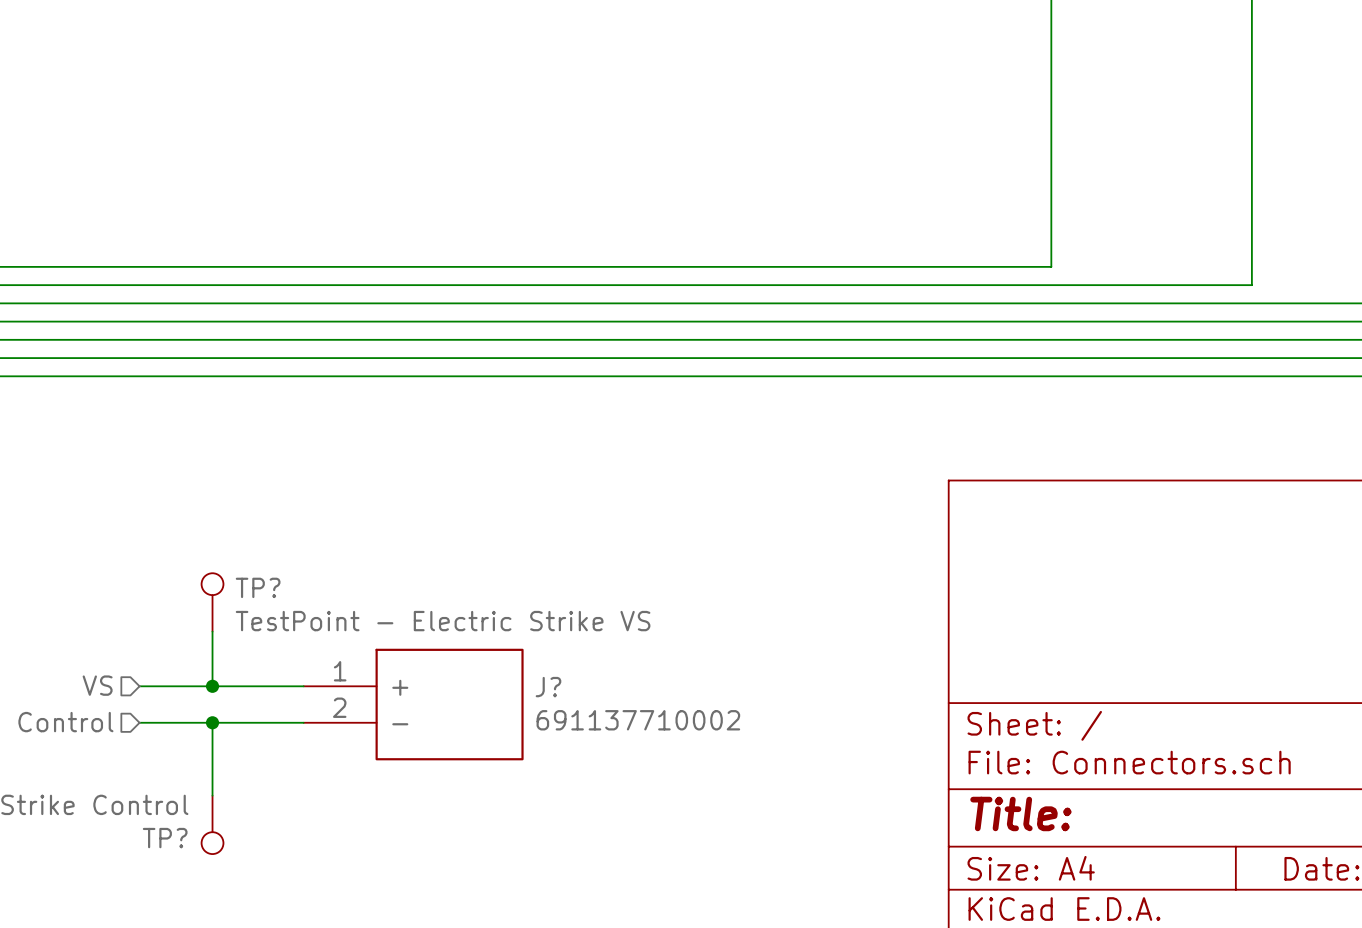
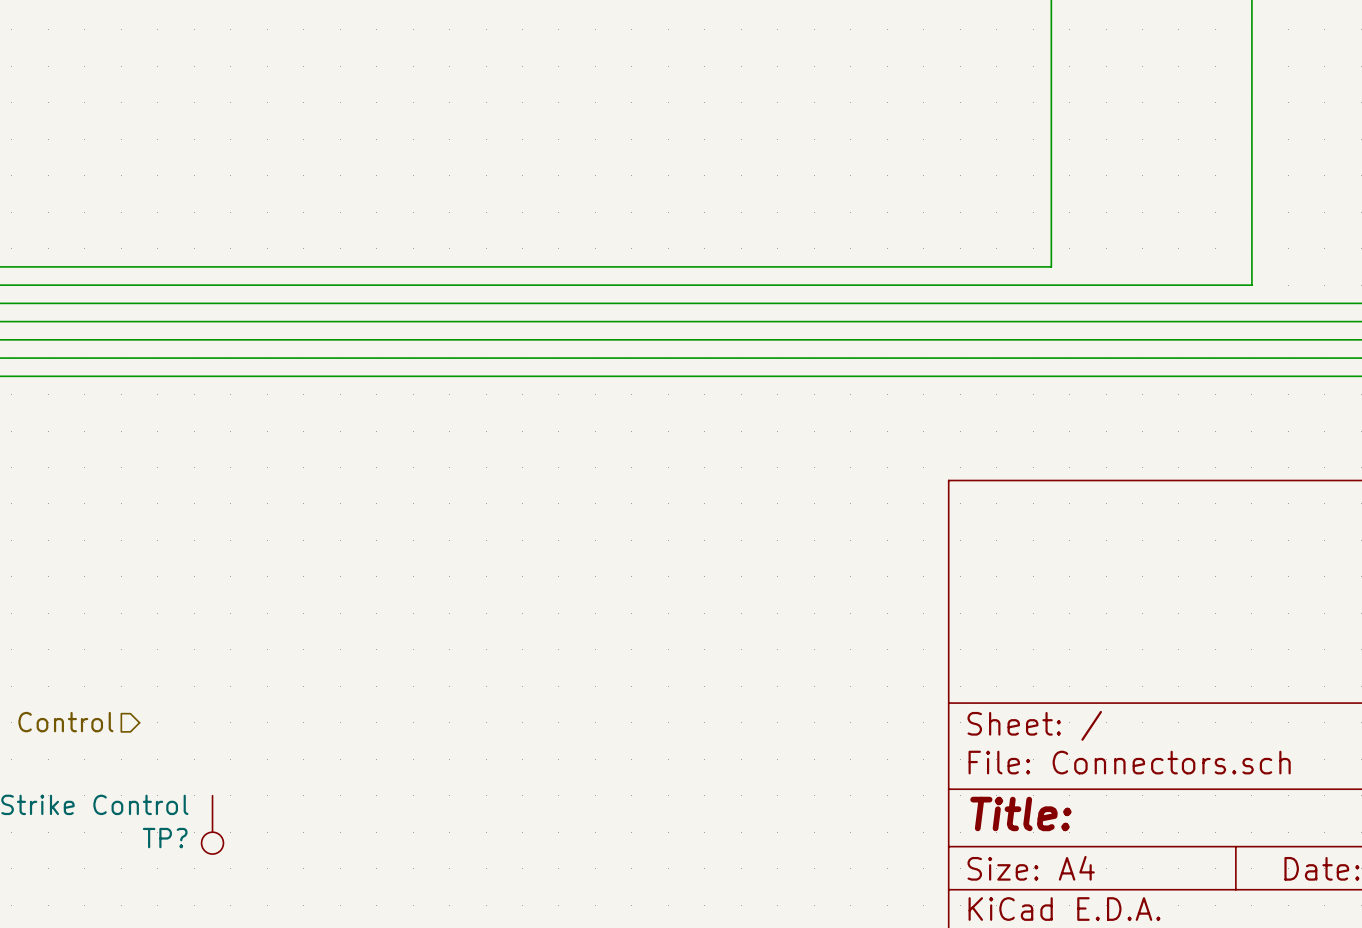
TP?: TestPoint - Electric Strike VS (212, 602) -> none
wire: (212, 631) (212, 686) -> none
hierarchical label: VS (97, 685) -> none
wire: (139, 686) (303, 686) -> none
junction: (212, 686) -> none
J?: 691137710002 (413, 704) -> none
wire: (139, 722) (303, 722) -> none
wire: (212, 722) (212, 795) -> none
junction: (212, 722) -> none

